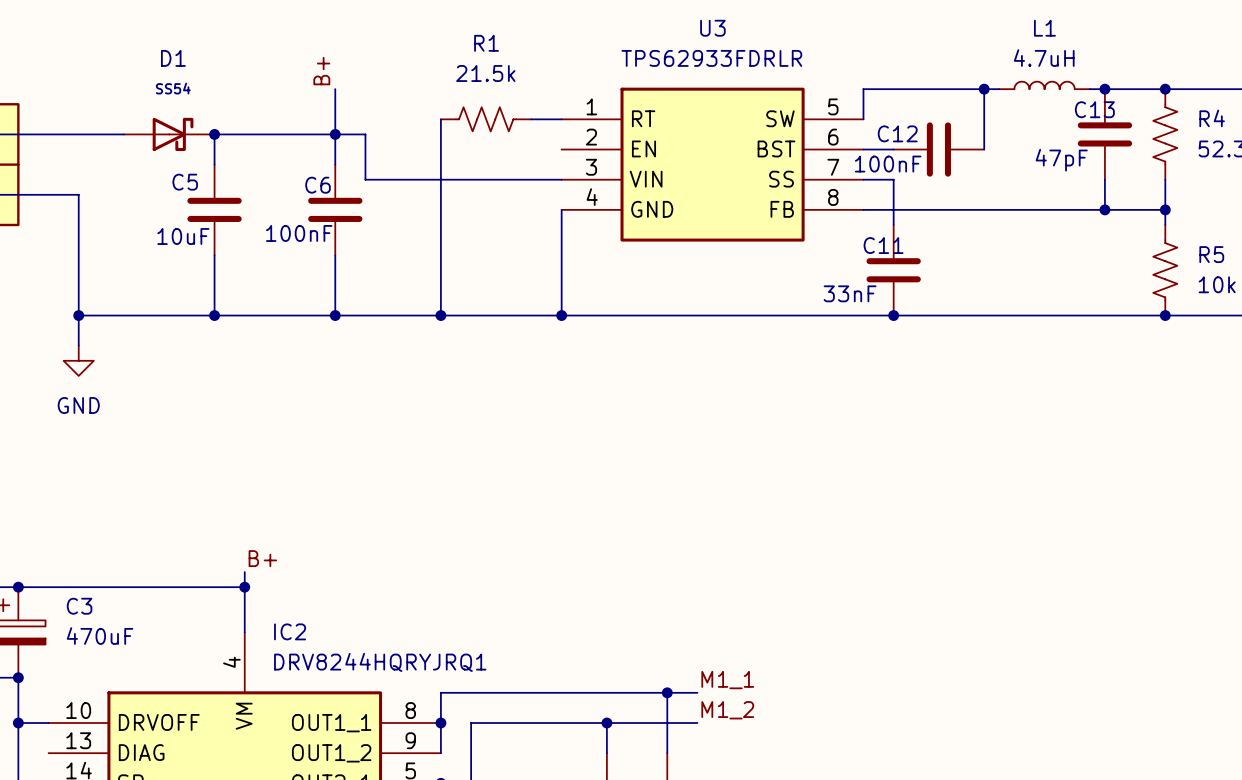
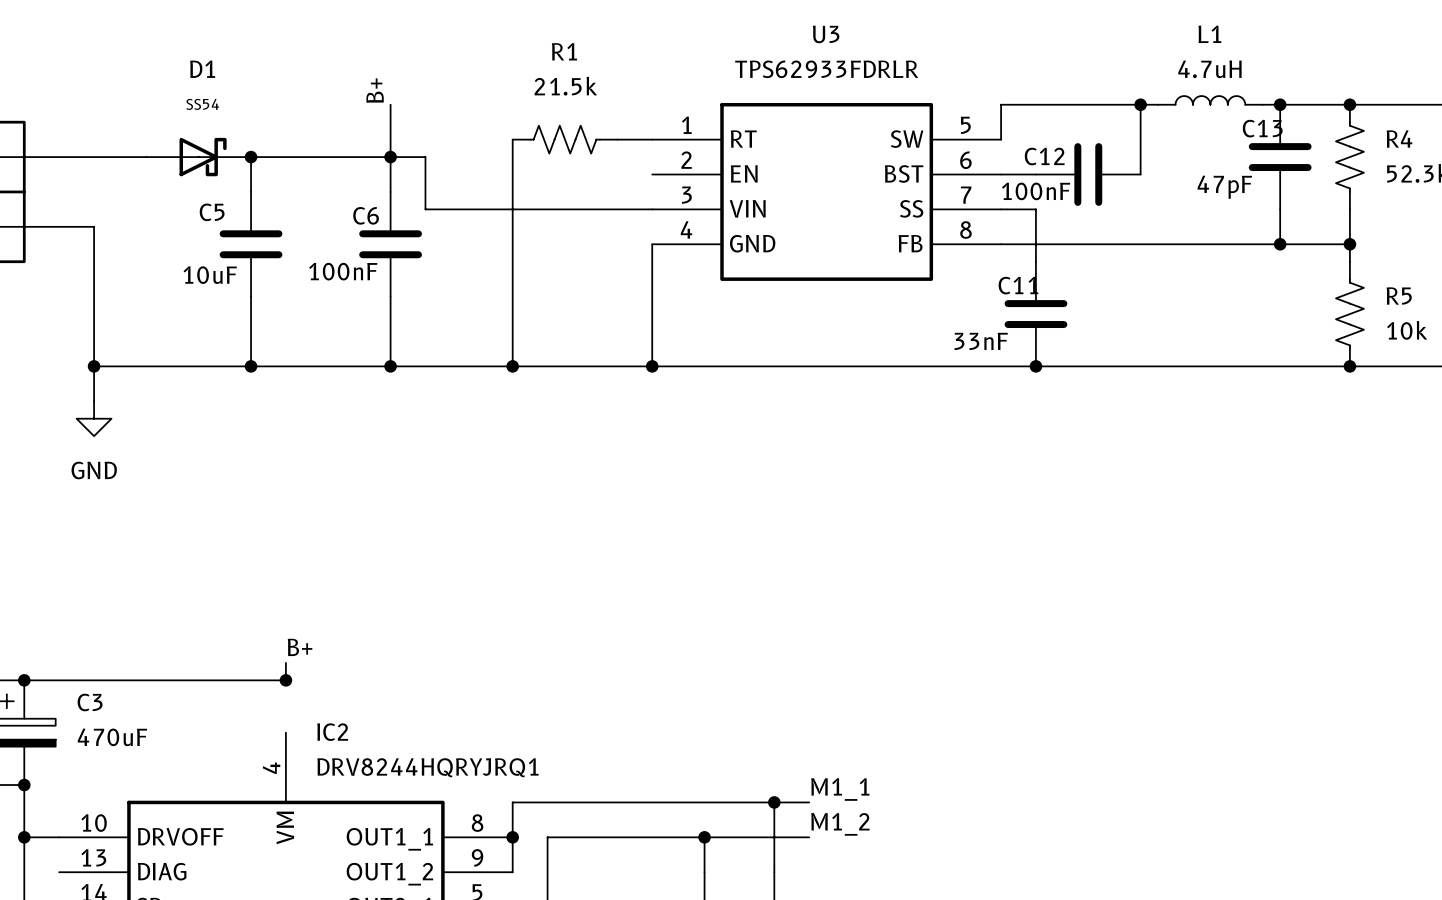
wire: (244, 587) (244, 632) -> none

